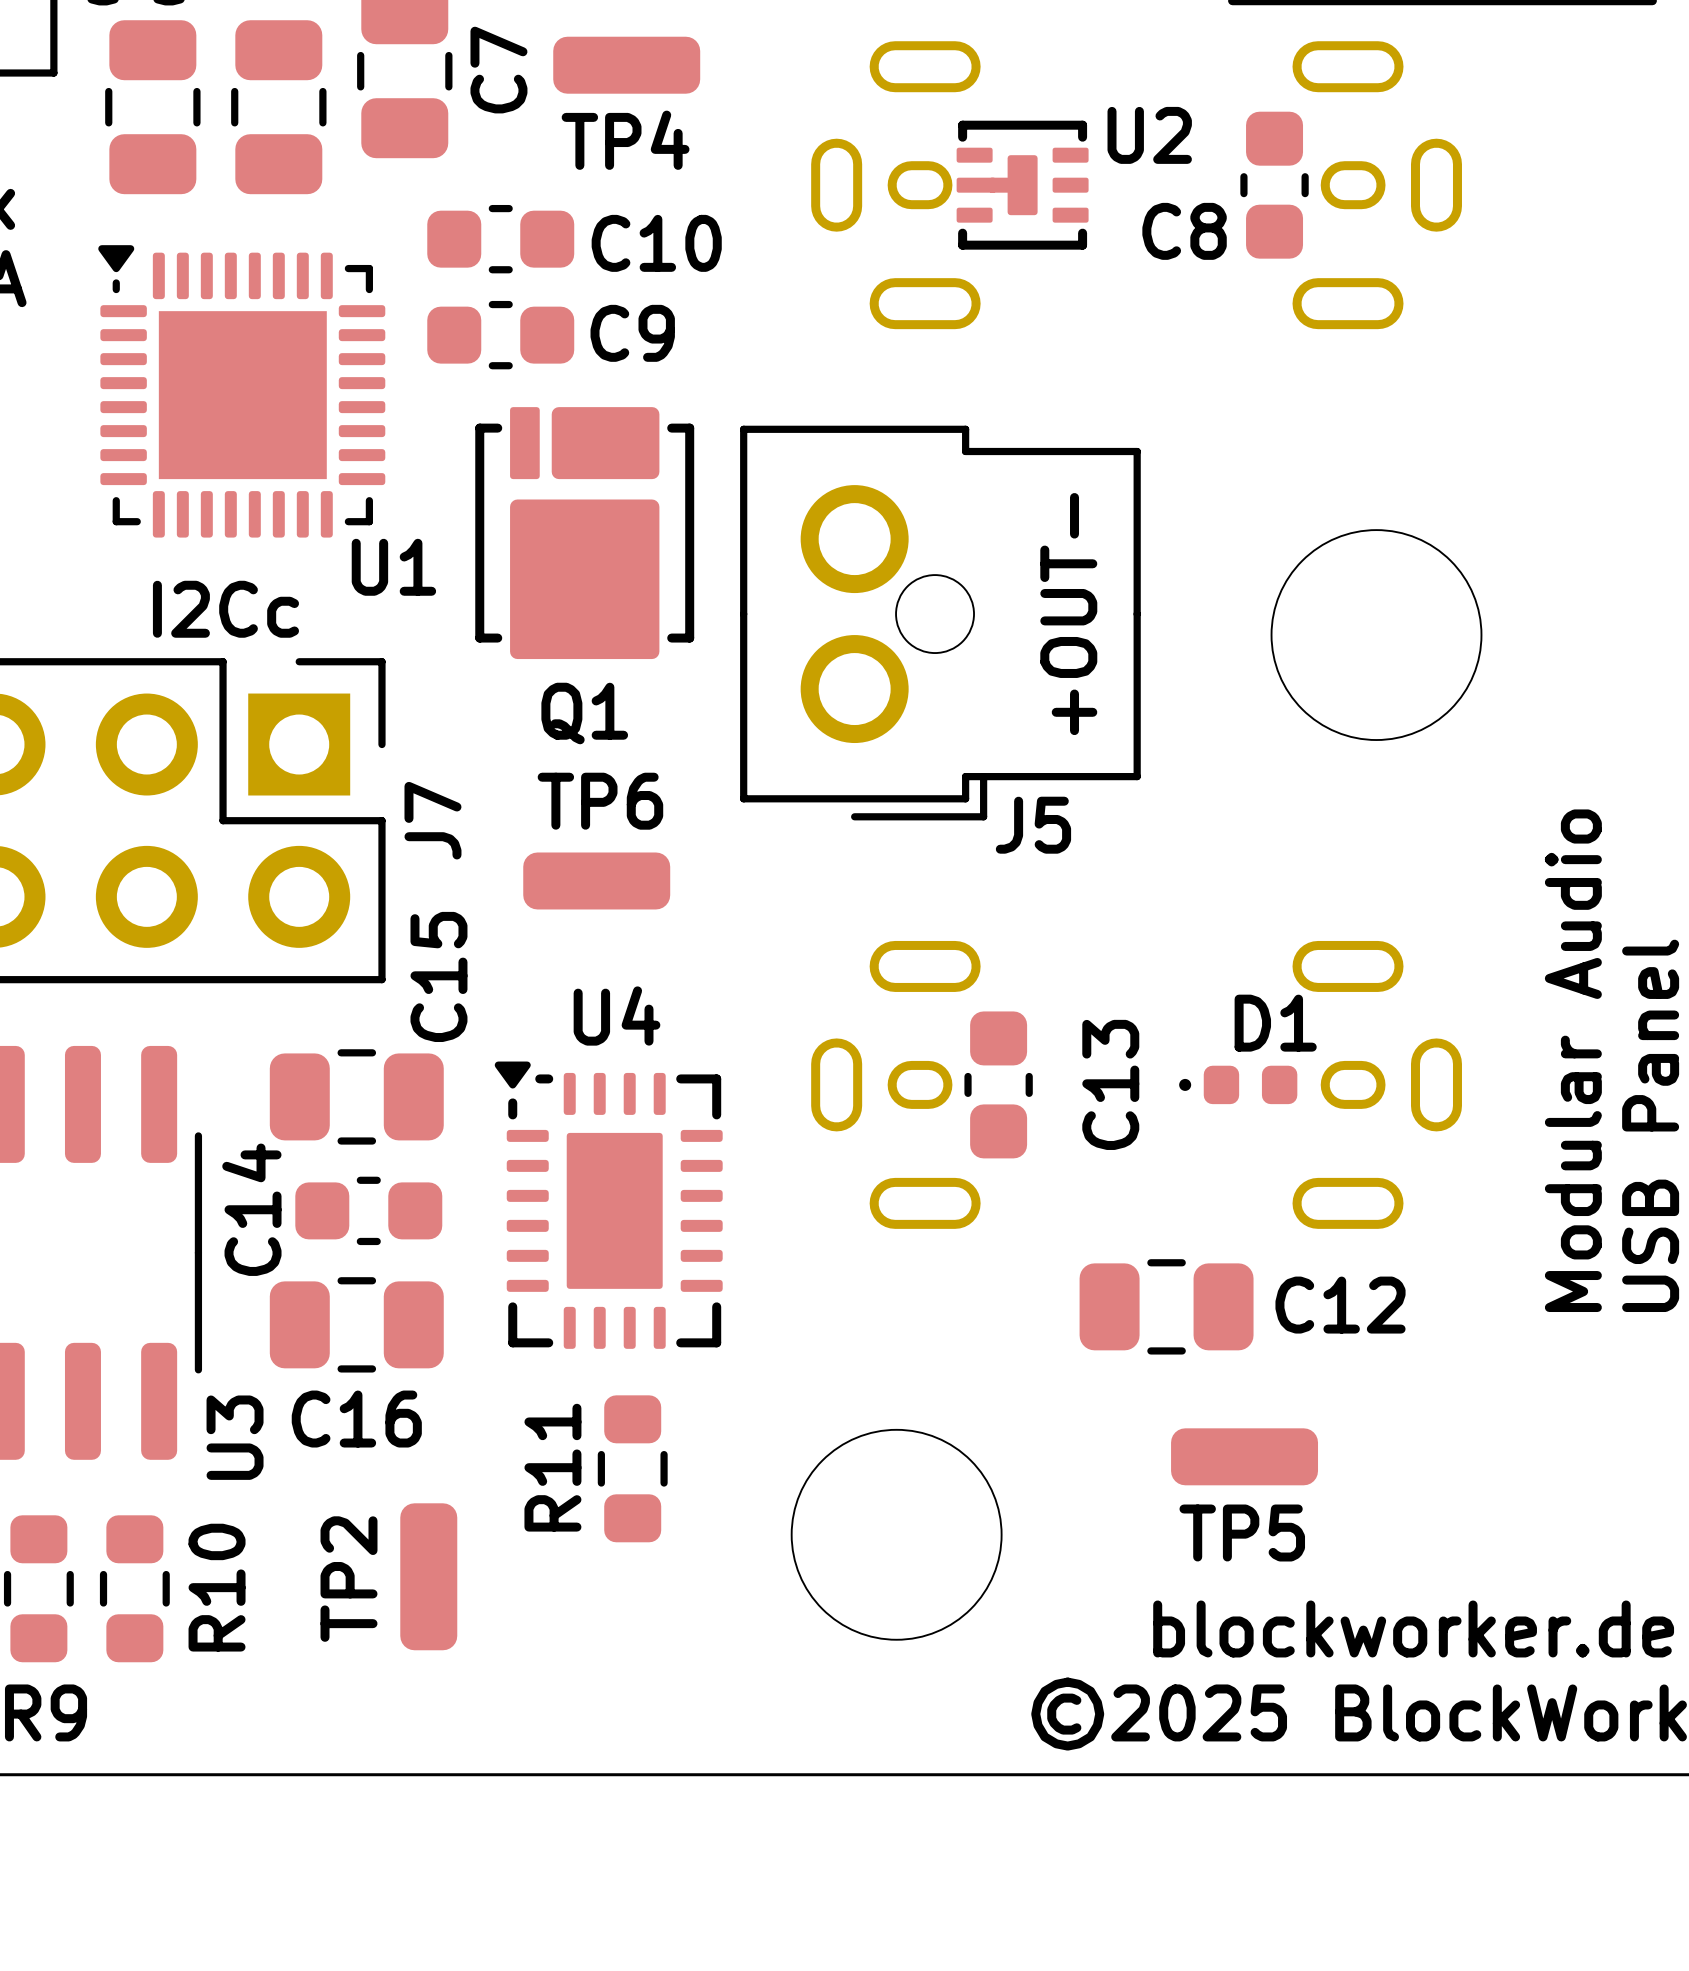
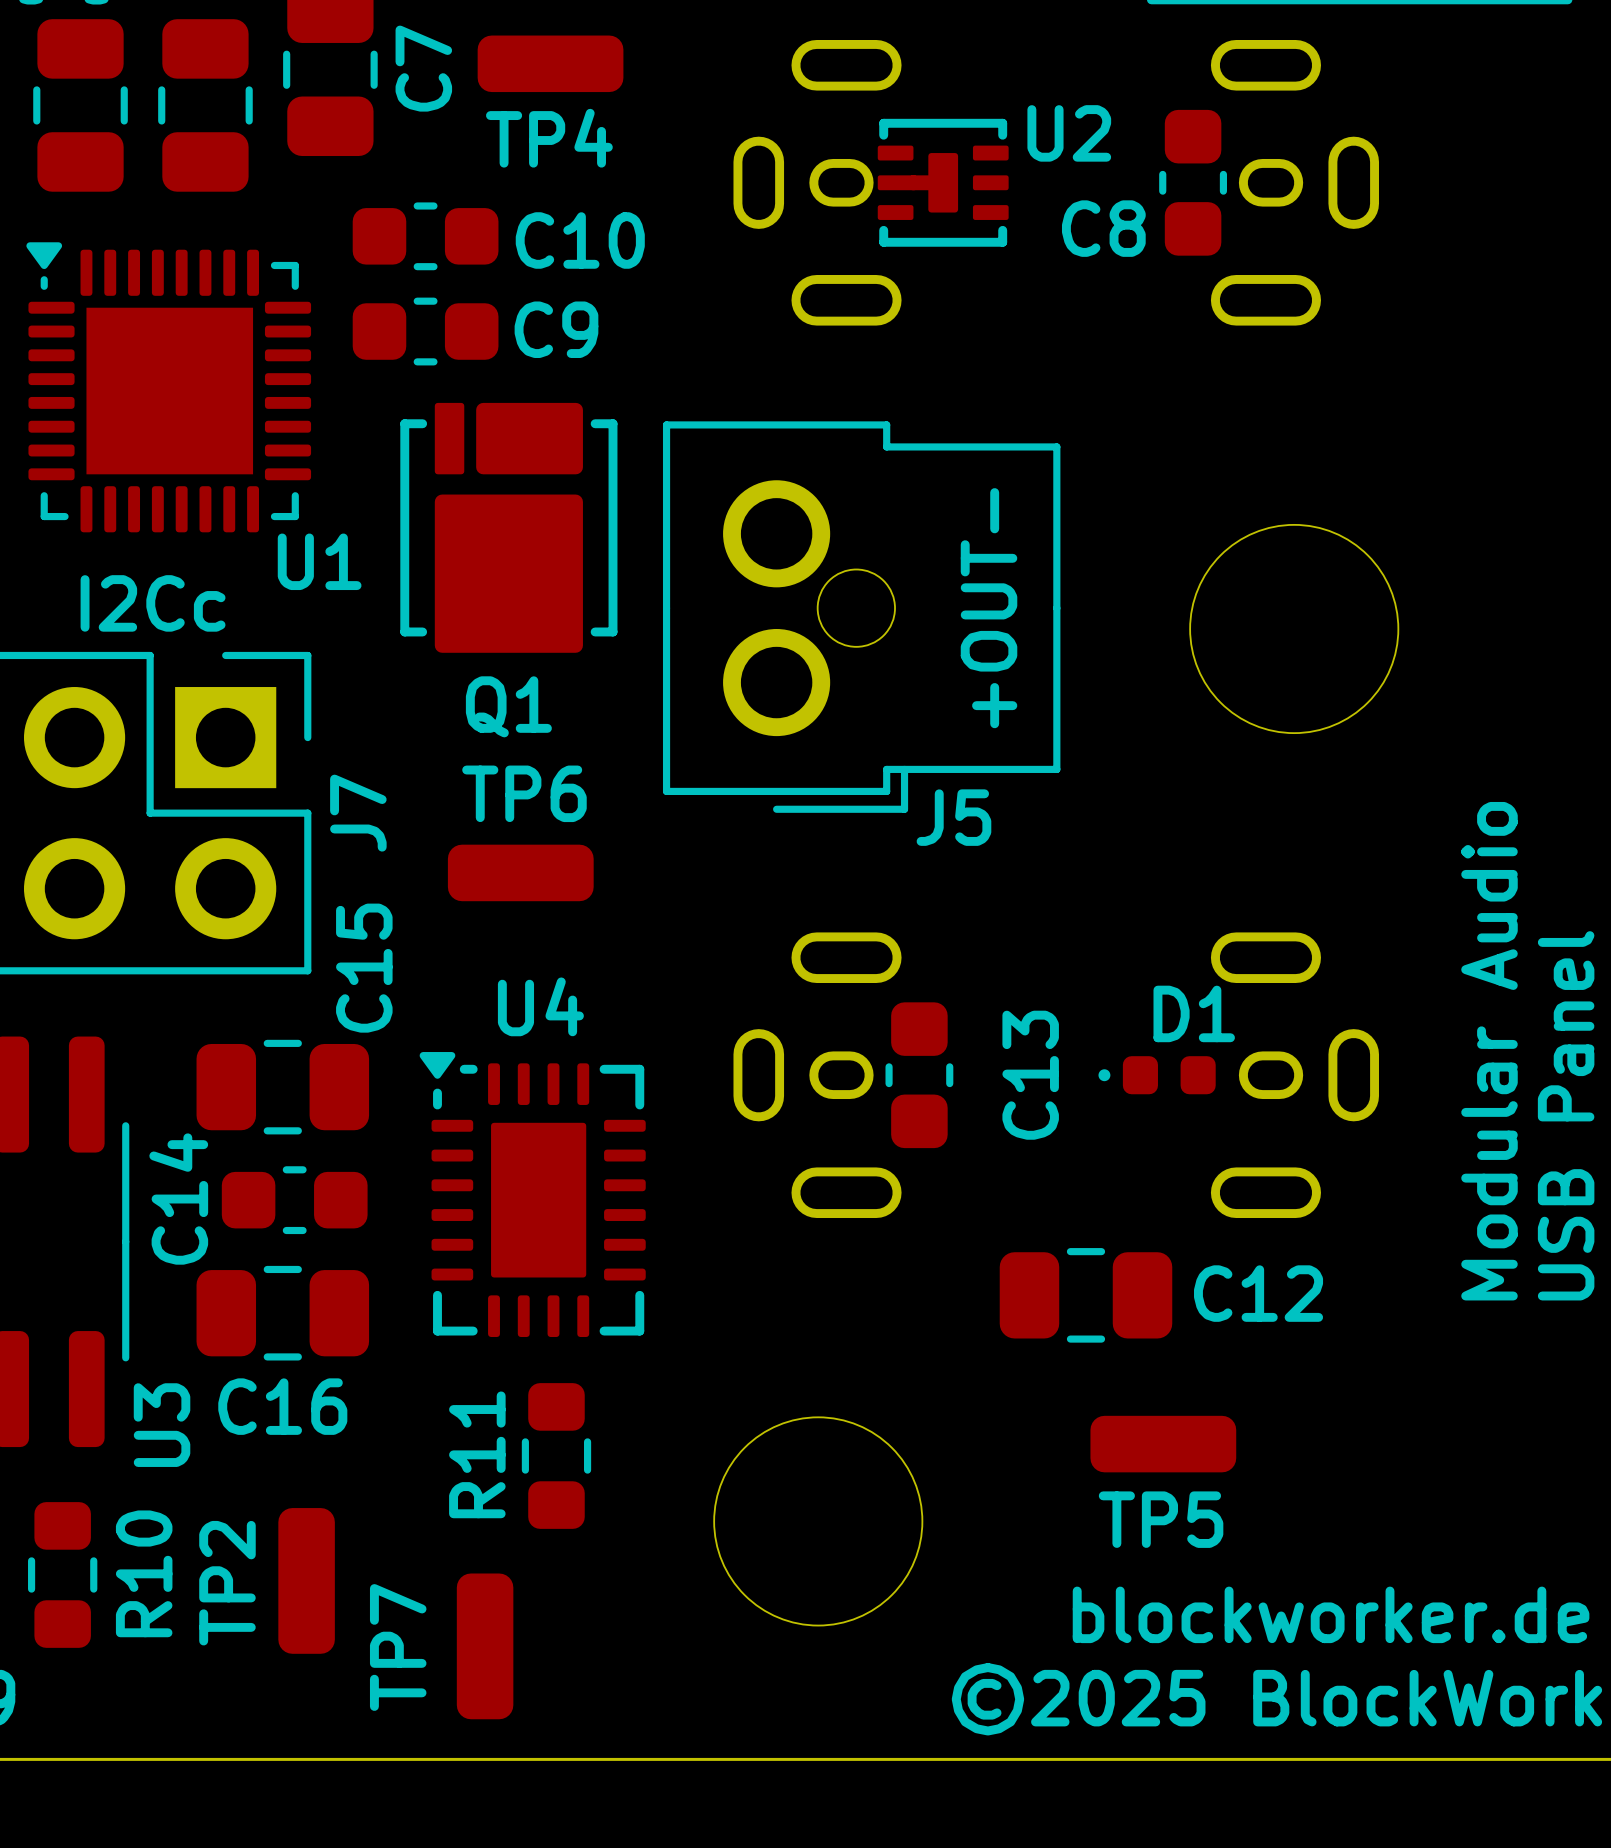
TP2 position: (428, 1576) -> (306, 1580)
TP7: none -> (485, 1646)

